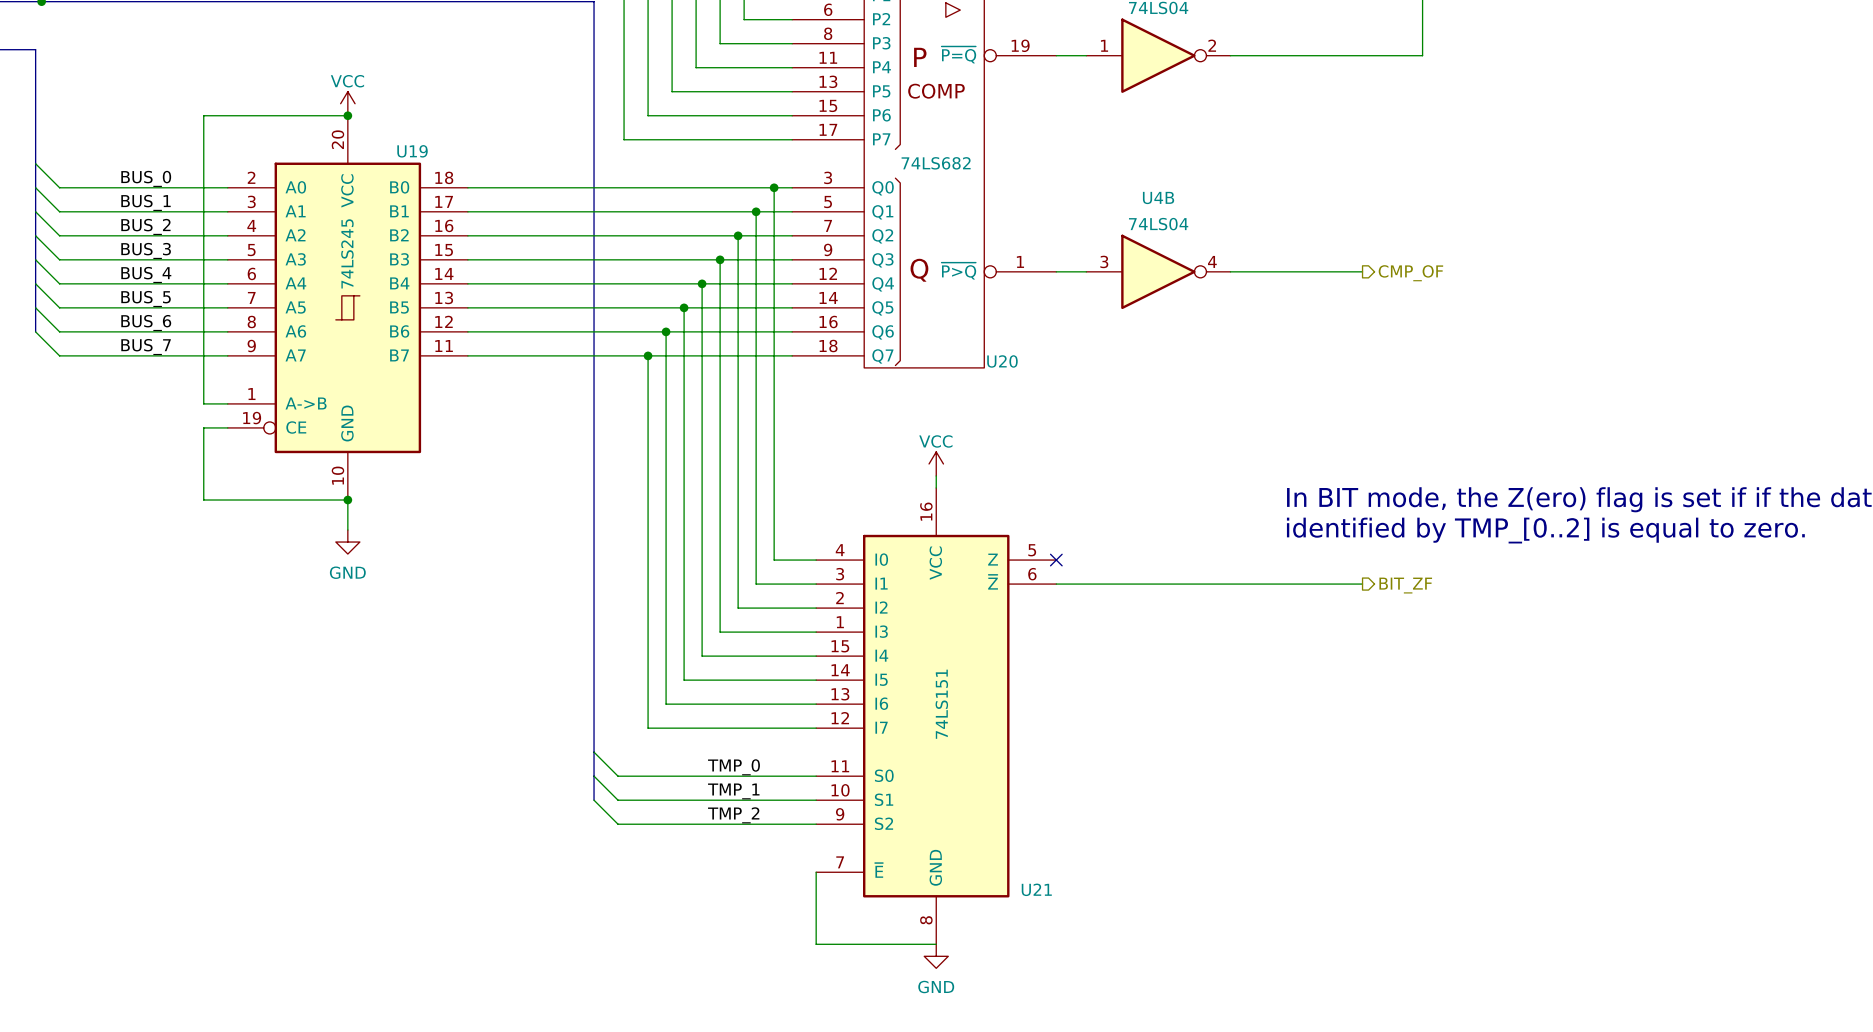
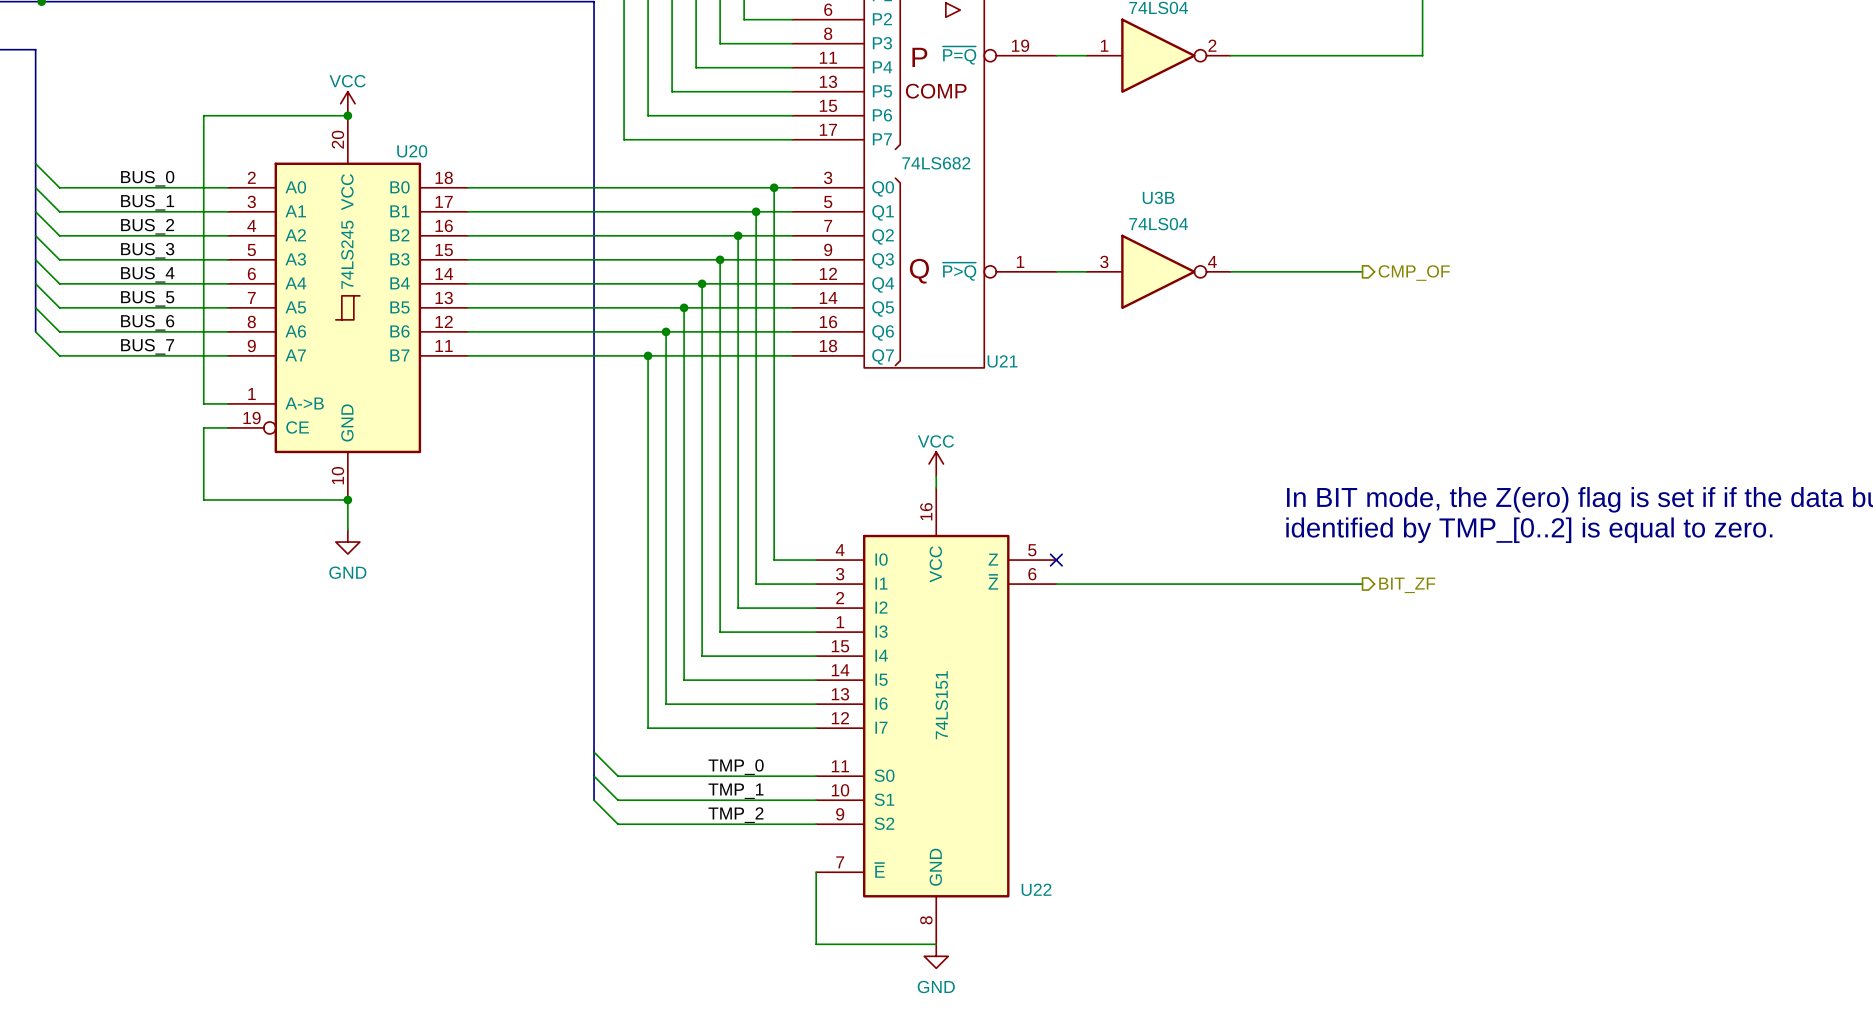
U19 name: U19 (412, 151) -> U20 (412, 151)
U4B name: U4B (1158, 197) -> U3B (1158, 197)
U20 name: U20 (1002, 361) -> U21 (1002, 361)
U21 name: U21 (1036, 889) -> U22 (1036, 889)

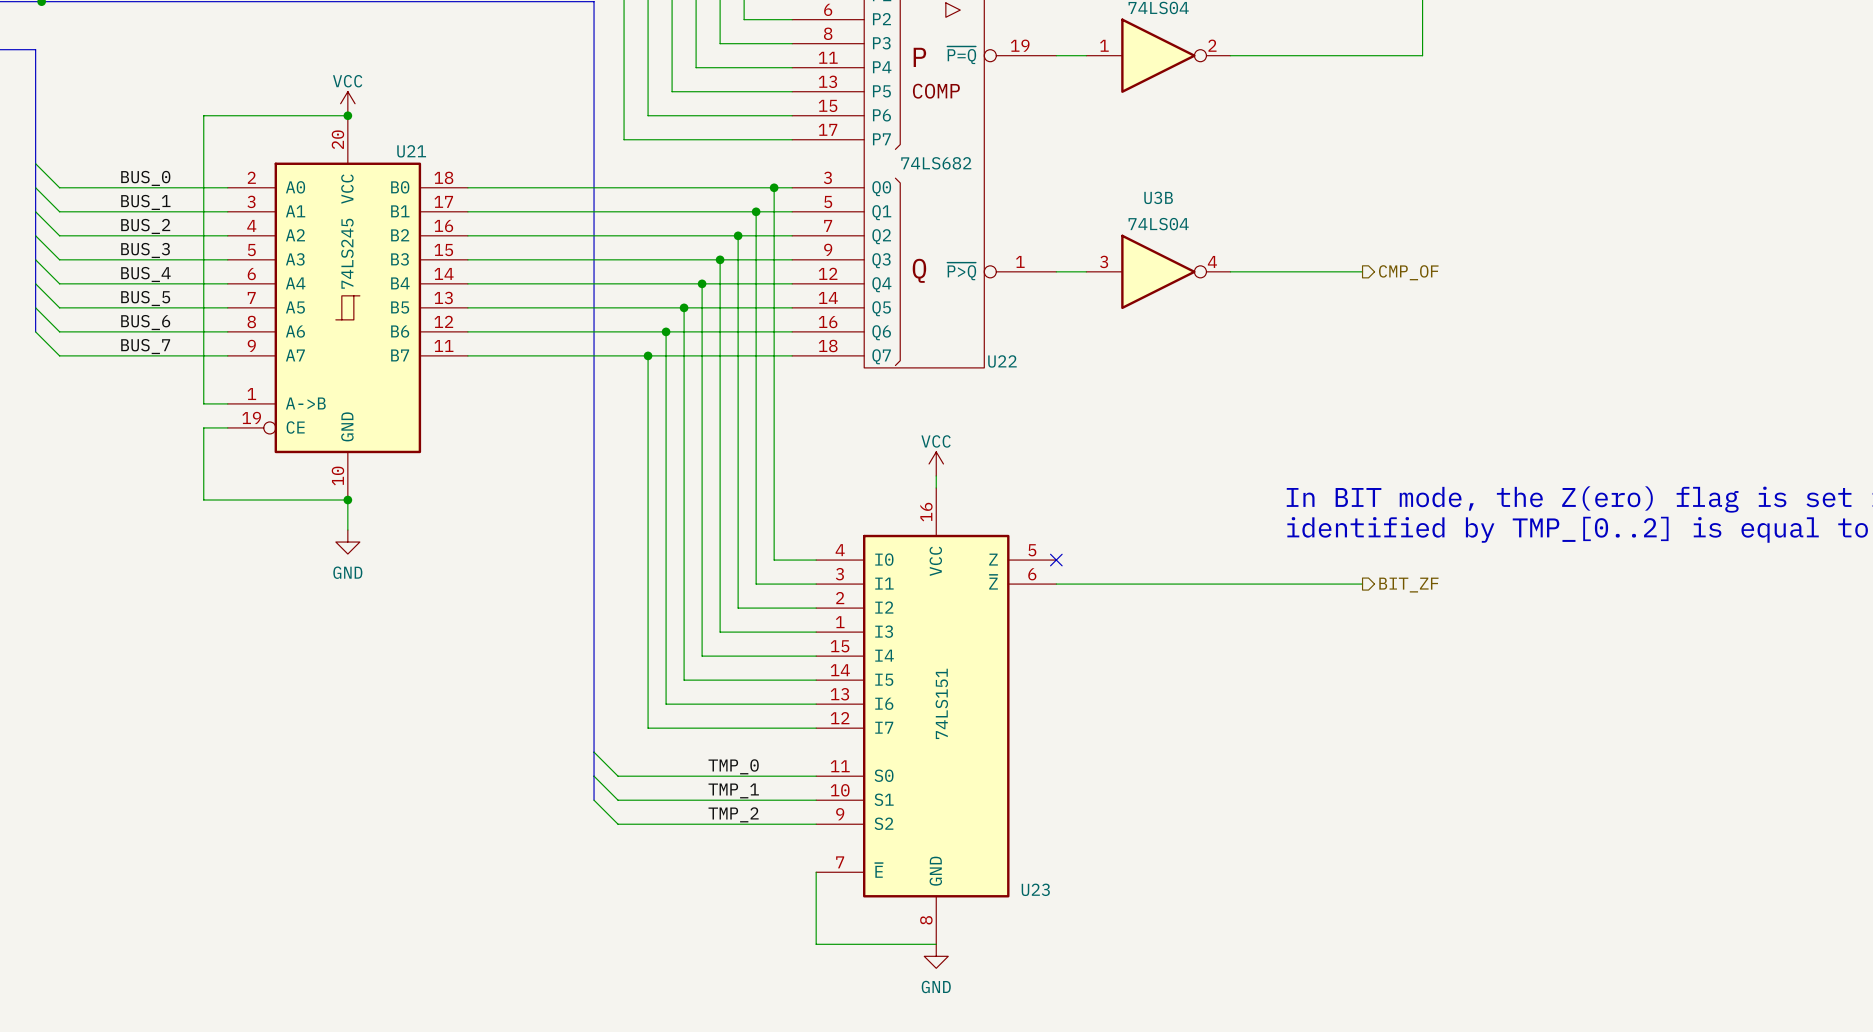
U20 name: U20 (412, 151) -> U21 (411, 151)
U21 name: U21 (1002, 361) -> U22 (1002, 361)
U22 name: U22 (1036, 889) -> U23 (1035, 889)

